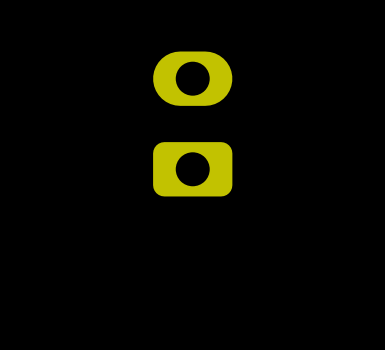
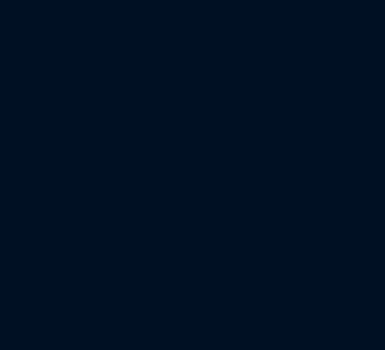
part: (192, 123) -> none

